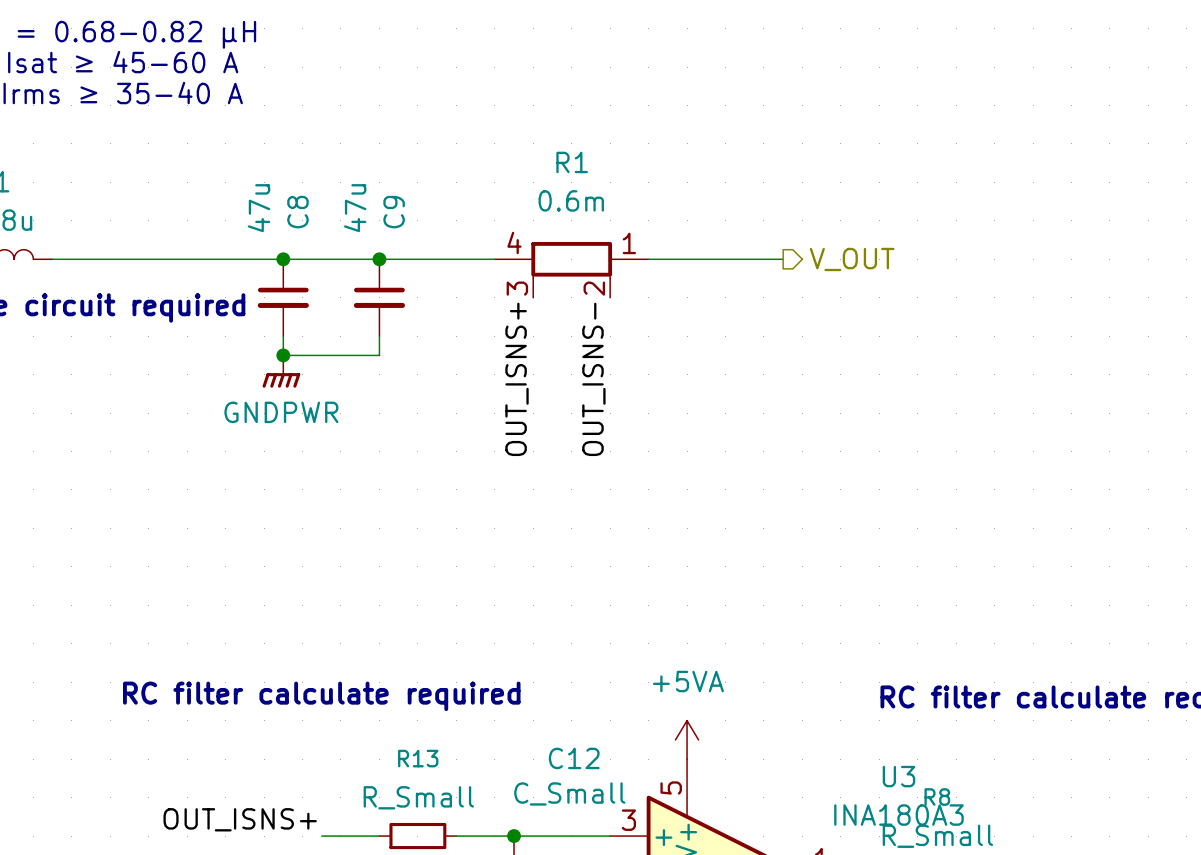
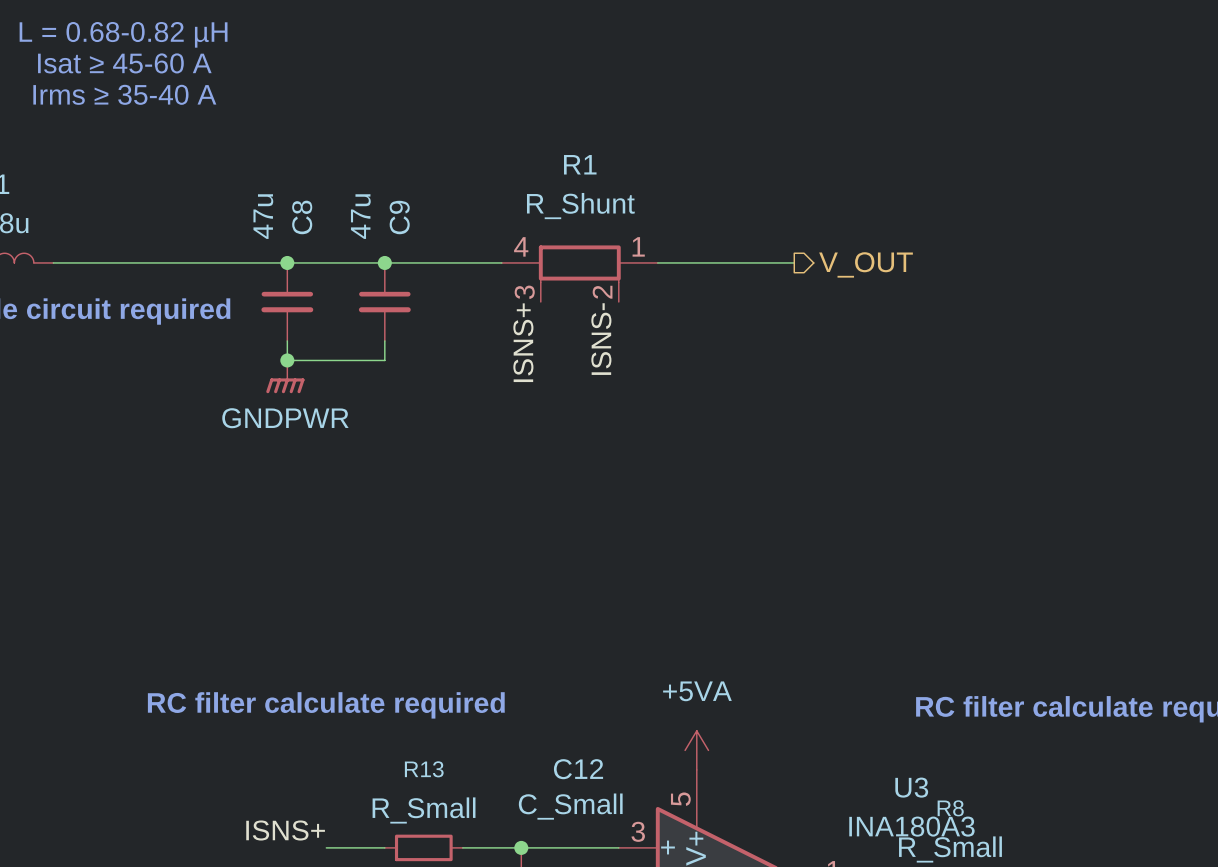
R1 value: 0.6m (571, 200) -> R_Shunt (580, 206)
label: OUT_ISNS+ (517, 379) -> ISNS+ (523, 342)
label: OUT_ISNS- (593, 379) -> ISNS- (601, 339)
label: OUT_ISNS+ (240, 819) -> ISNS+ (285, 830)

